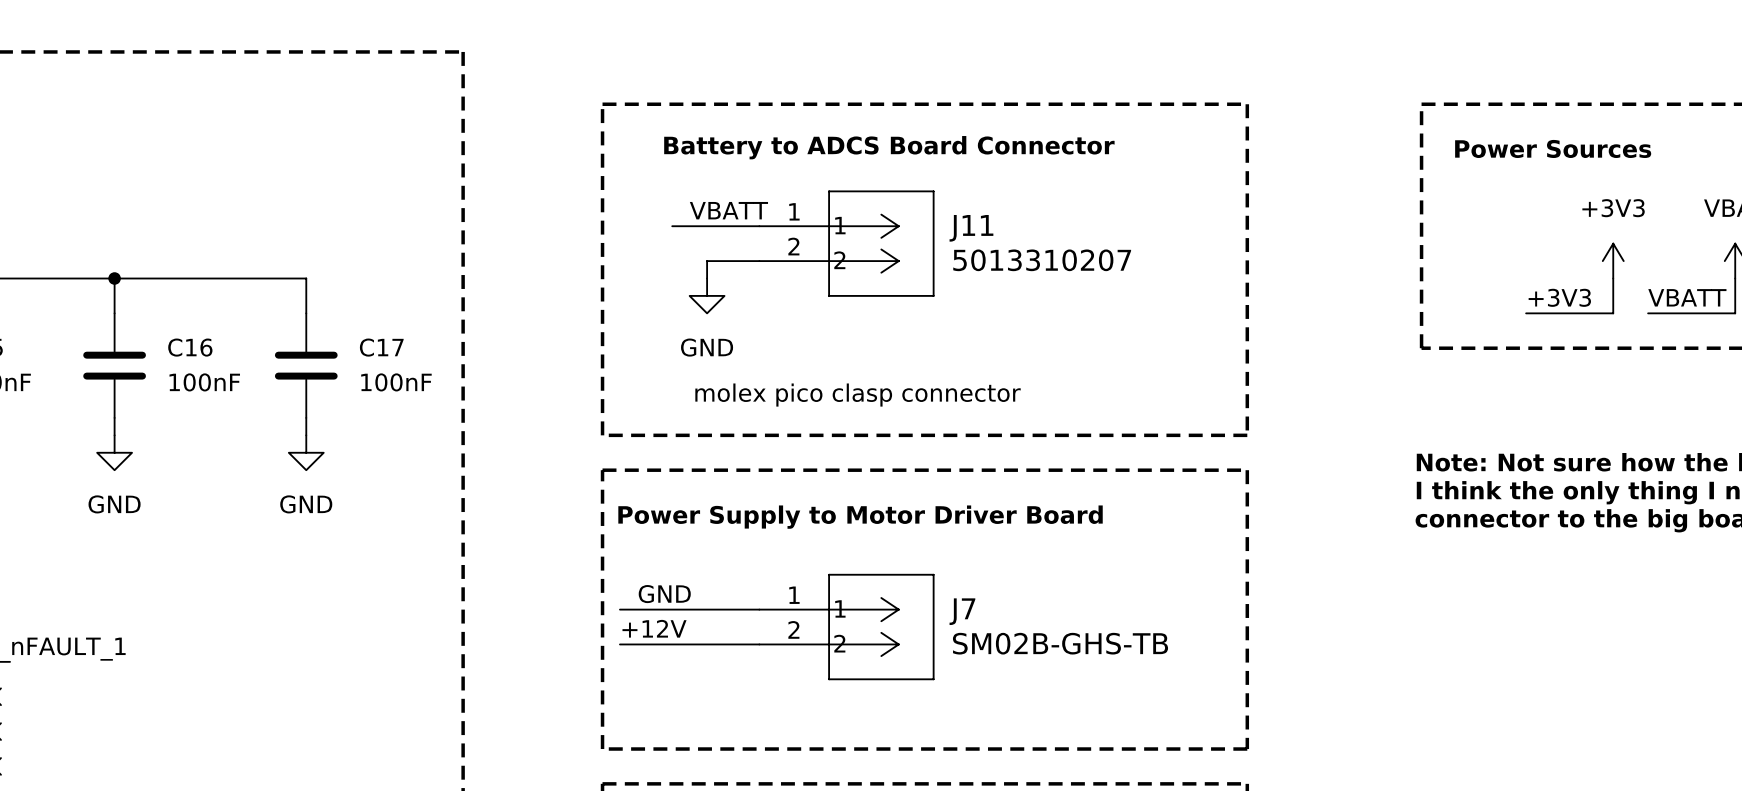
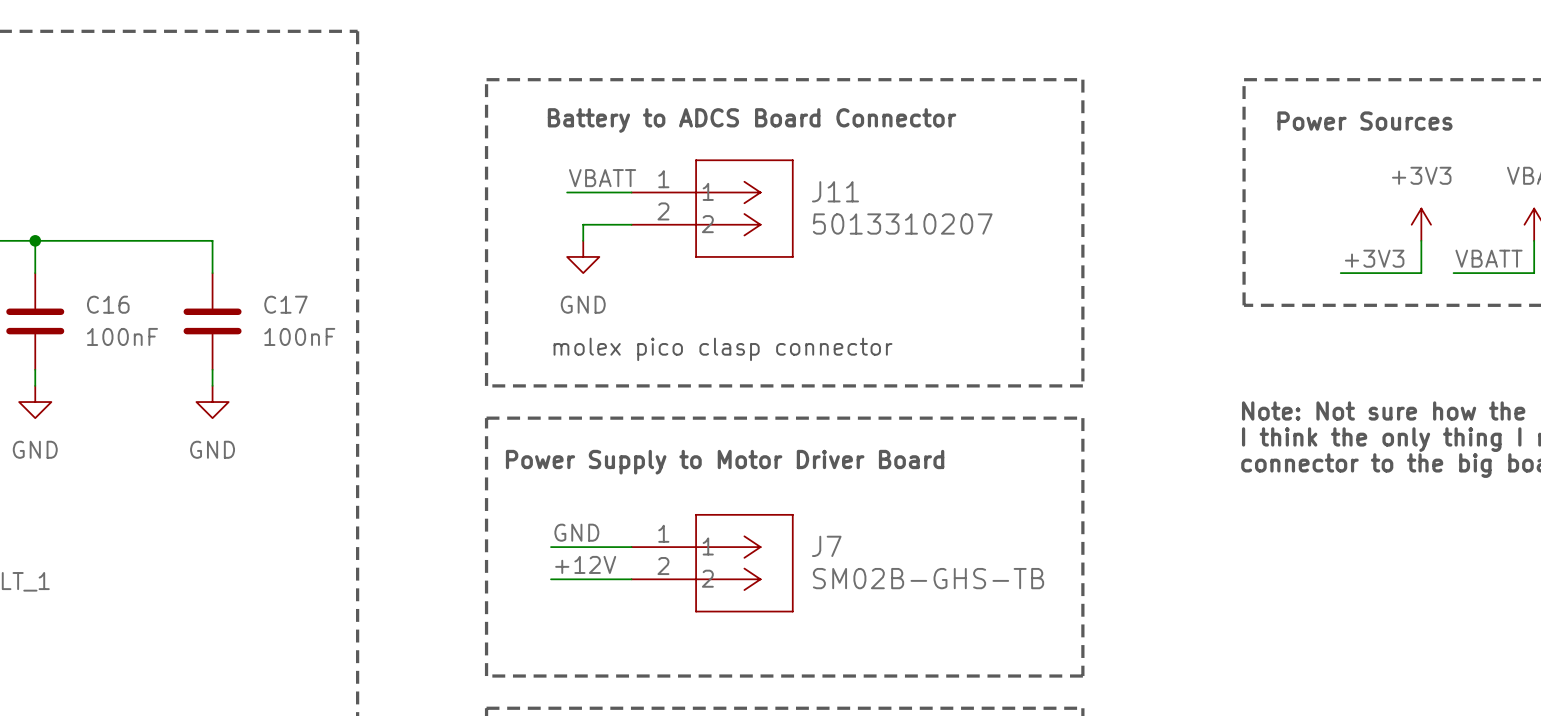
wire: (672, 226) (689, 226) -> none
label position: GND (664, 594) -> GND (576, 532)
wire: (619, 609) (672, 609) -> none
label position: +12V (654, 628) -> +12V (585, 564)
wire: (619, 644) (672, 644) -> none

